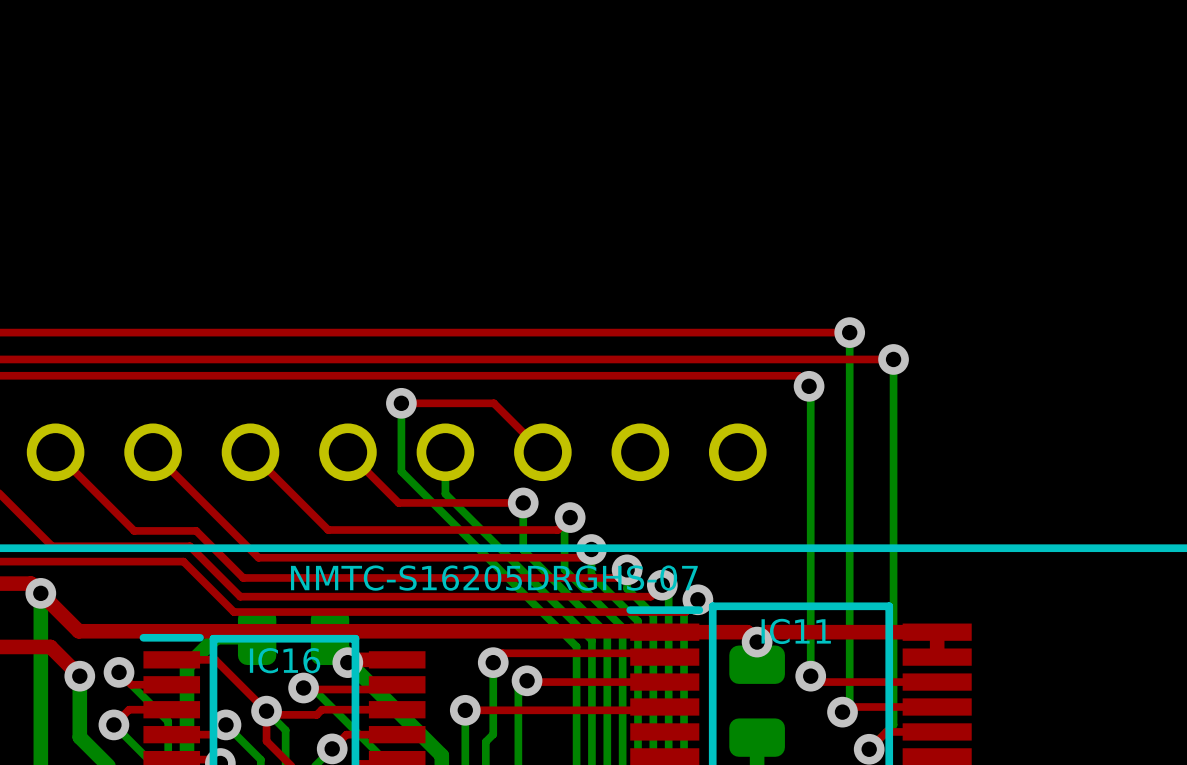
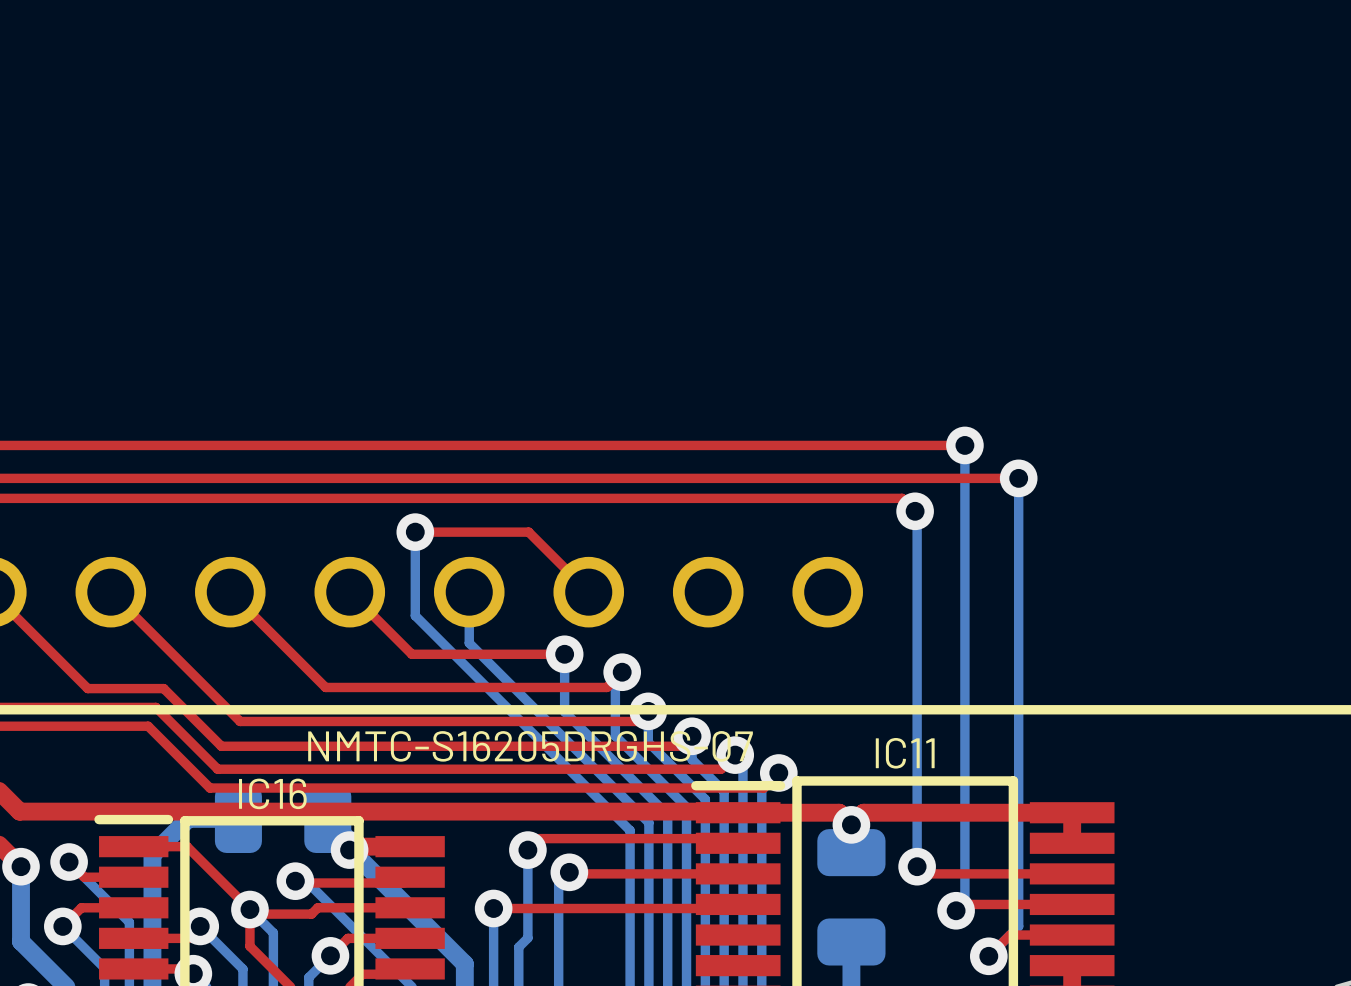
IC11 name position: IC11 (796, 631) -> IC11 (905, 753)
IC16 name position: IC16 (285, 660) -> IC16 (272, 793)

